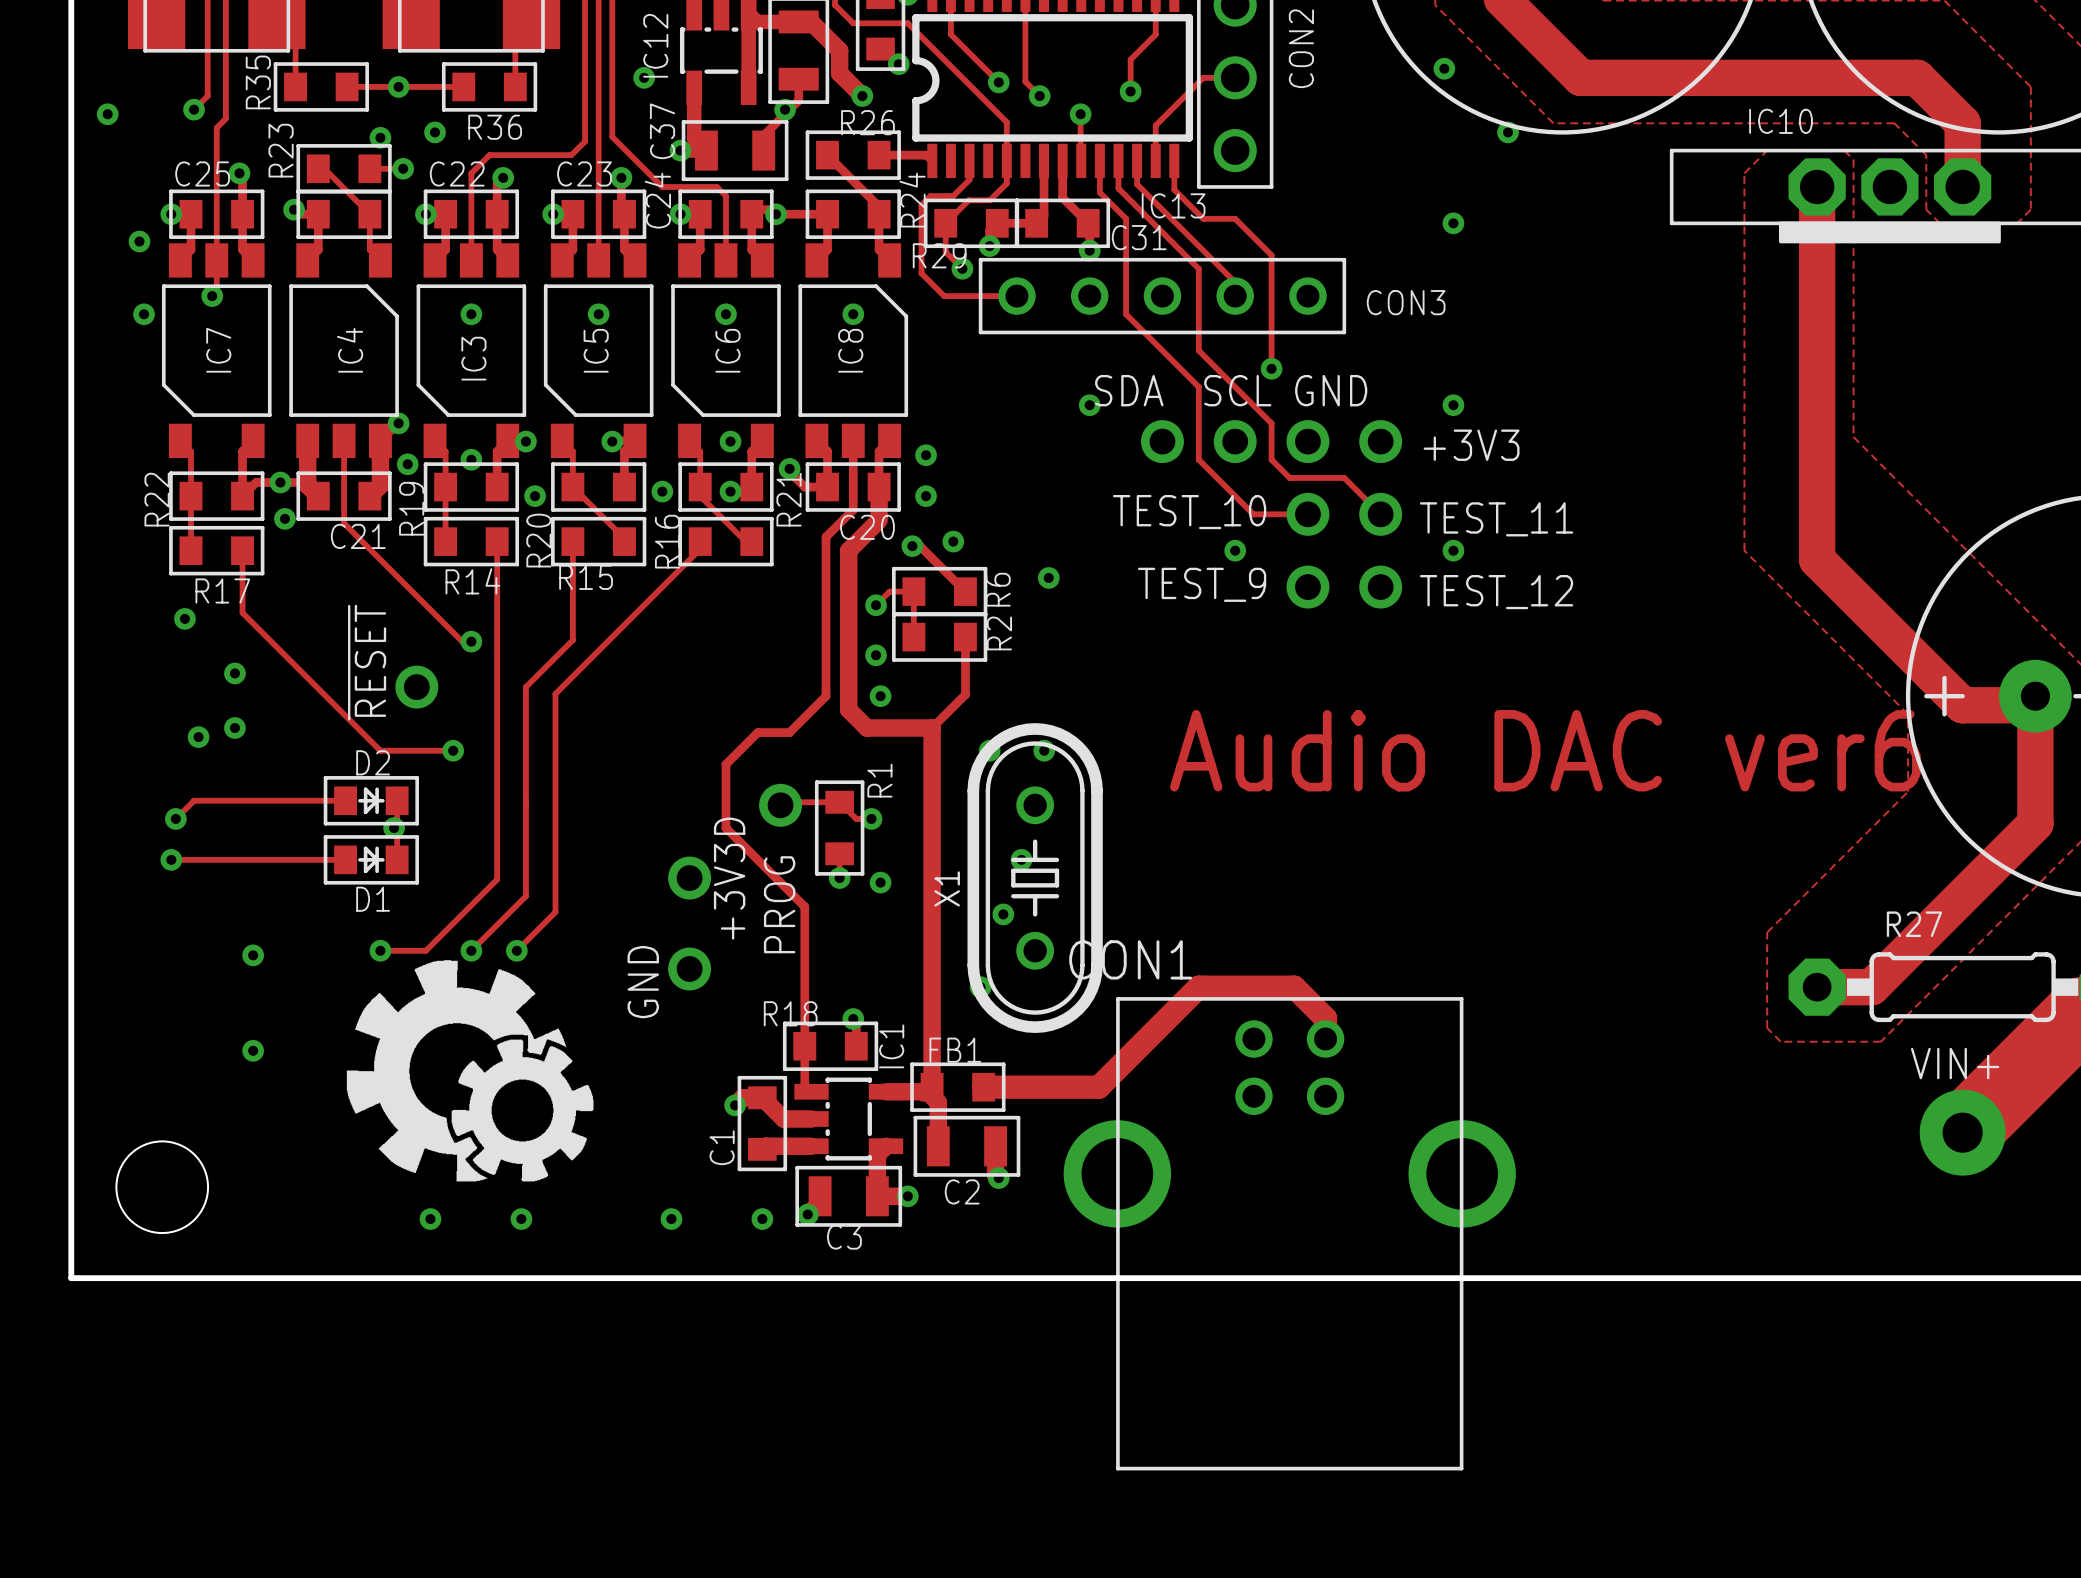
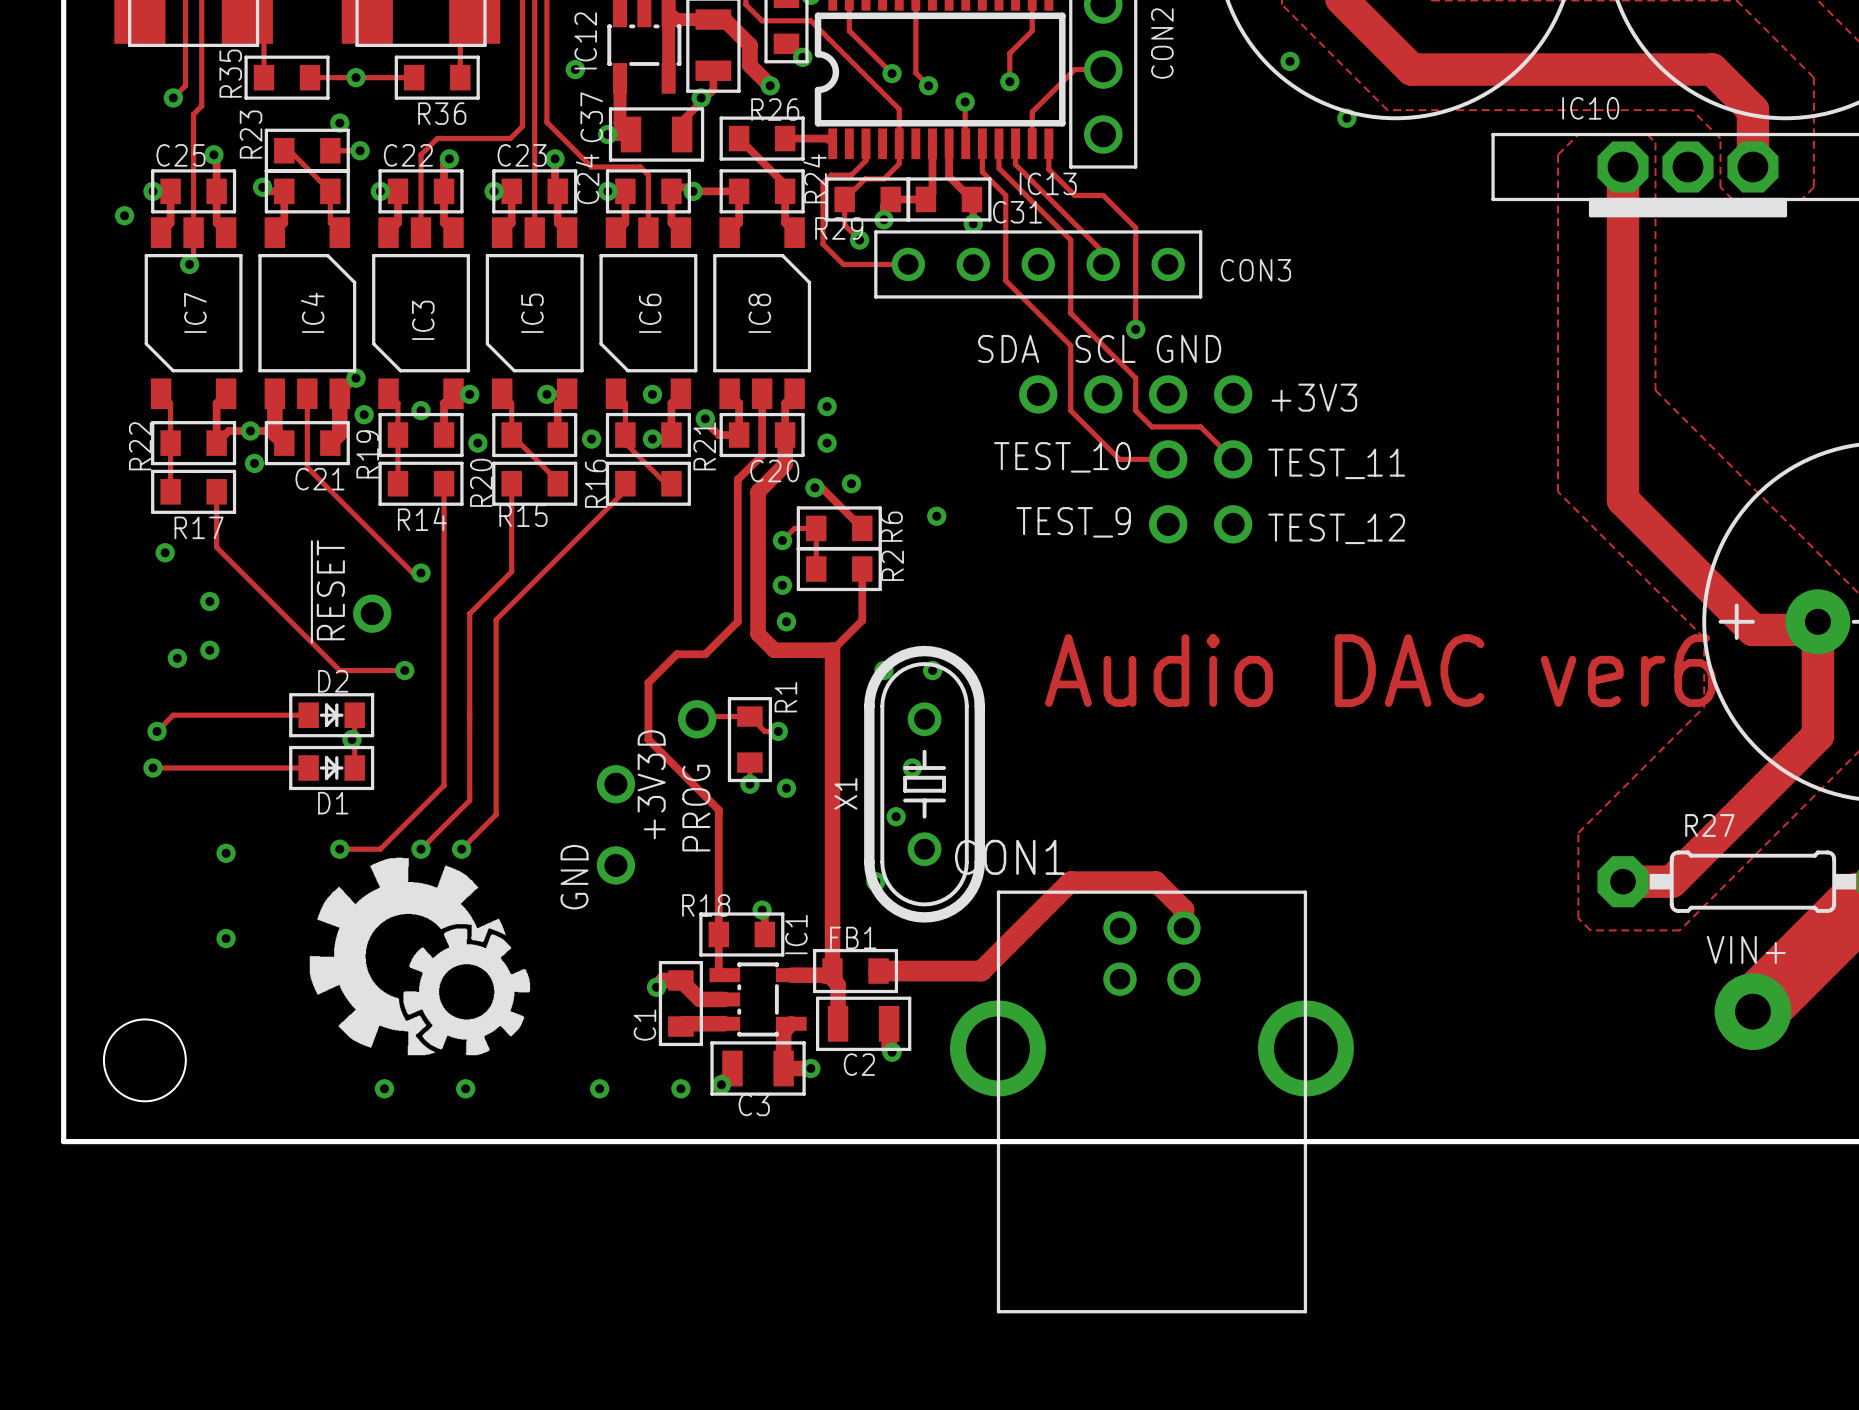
via: (107, 114) -> none
via: (435, 132) -> none
via: (1453, 223) -> none
via: (144, 314) -> none
via: (471, 314) -> none
via: (598, 314) -> none
via: (725, 314) -> none
via: (853, 314) -> none
via: (1089, 405) -> none
via: (1453, 405) -> none
via: (1235, 550) -> none
via: (1453, 550) -> none

